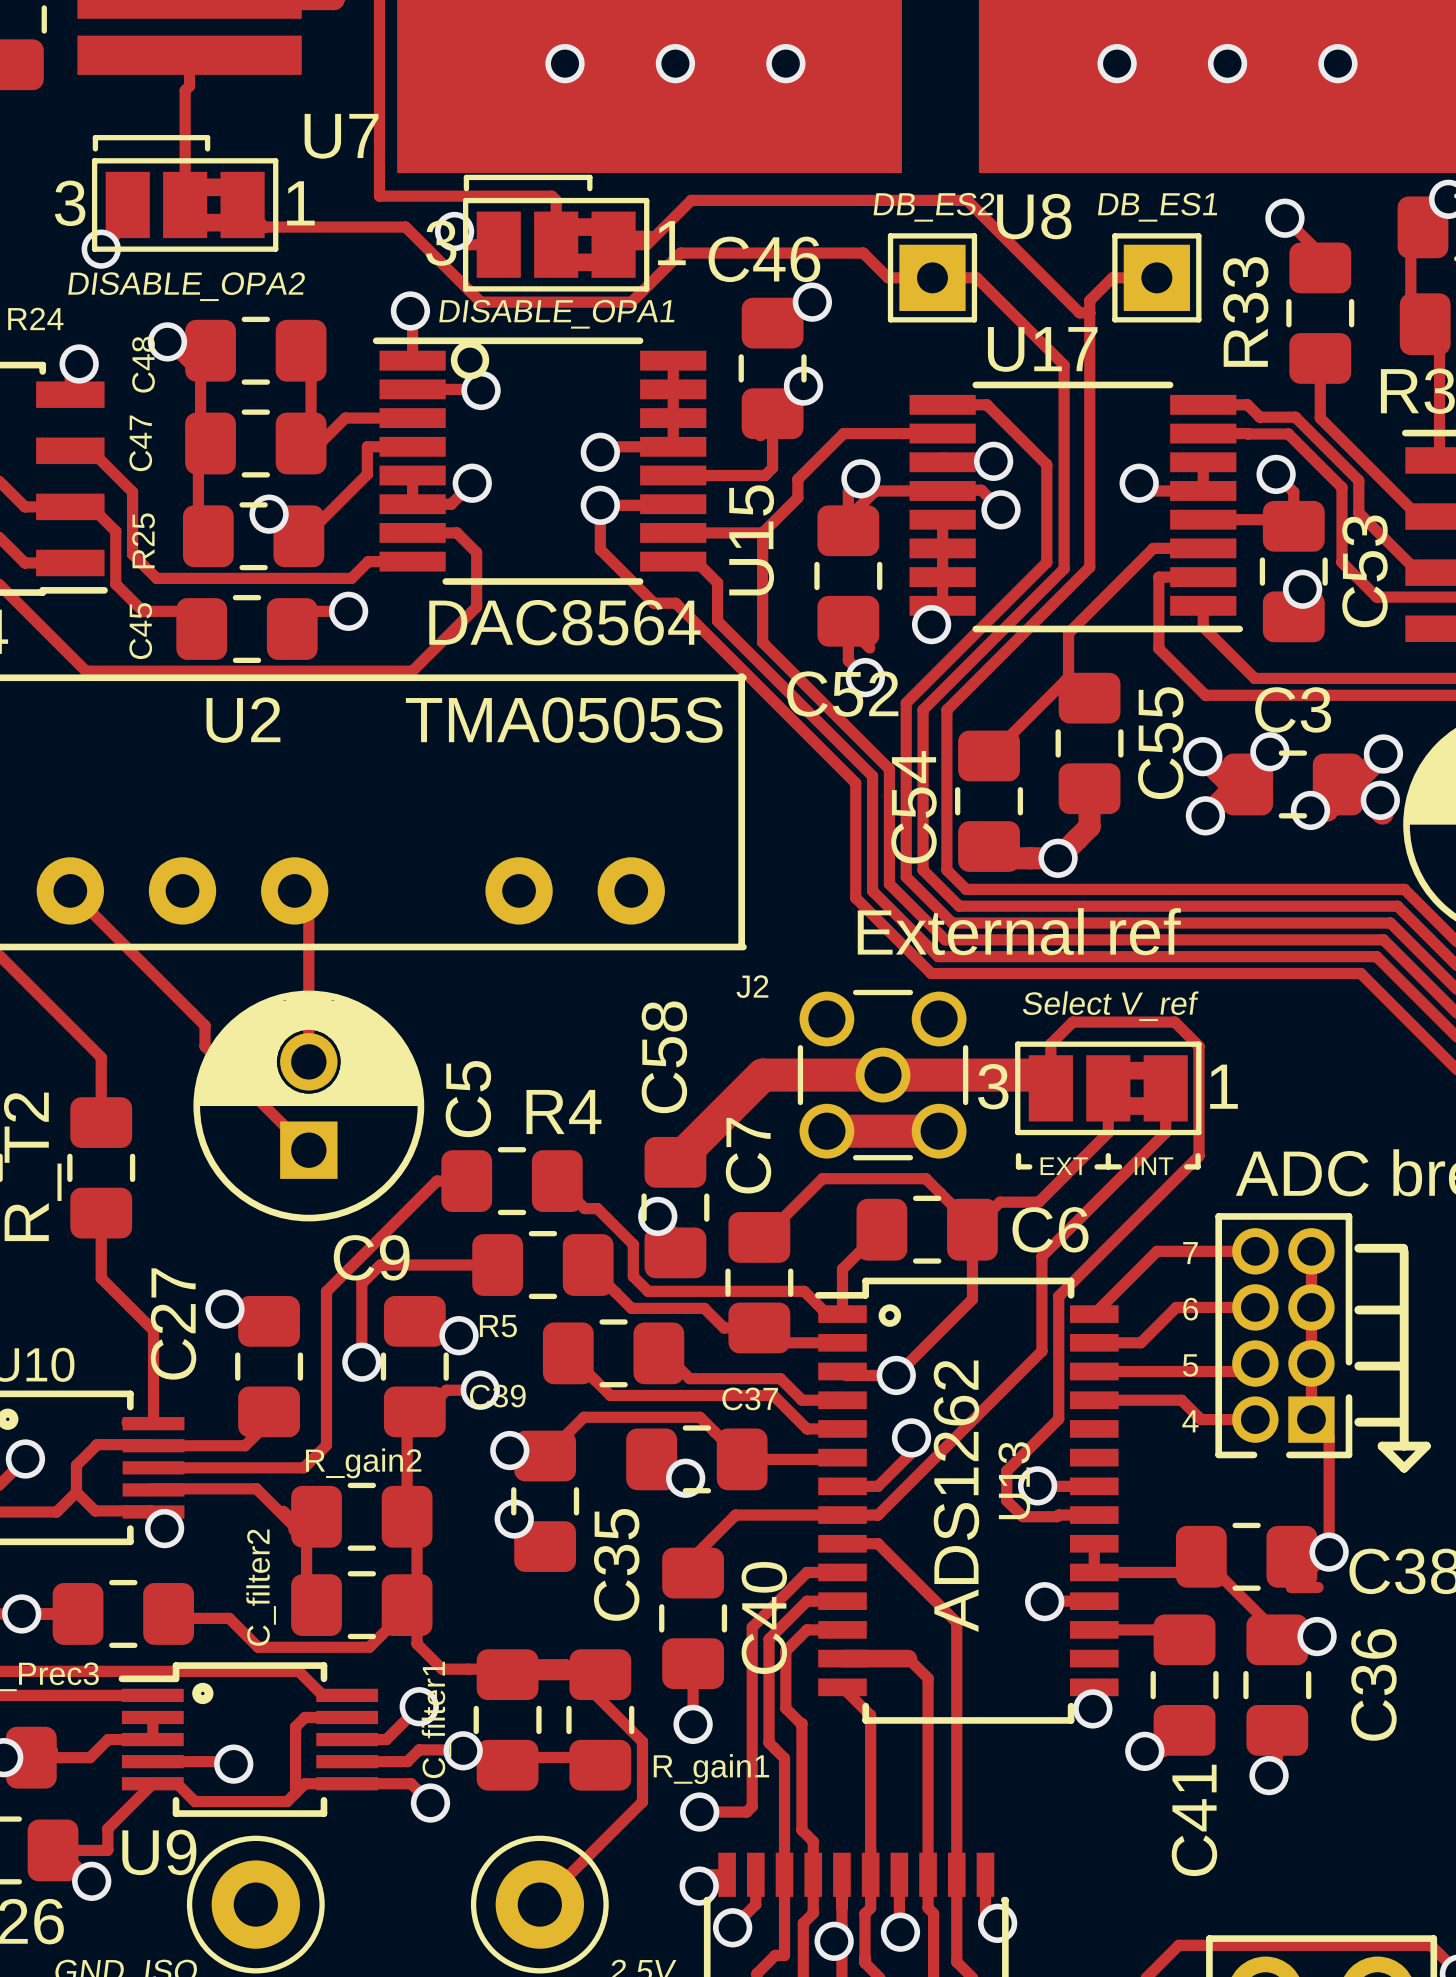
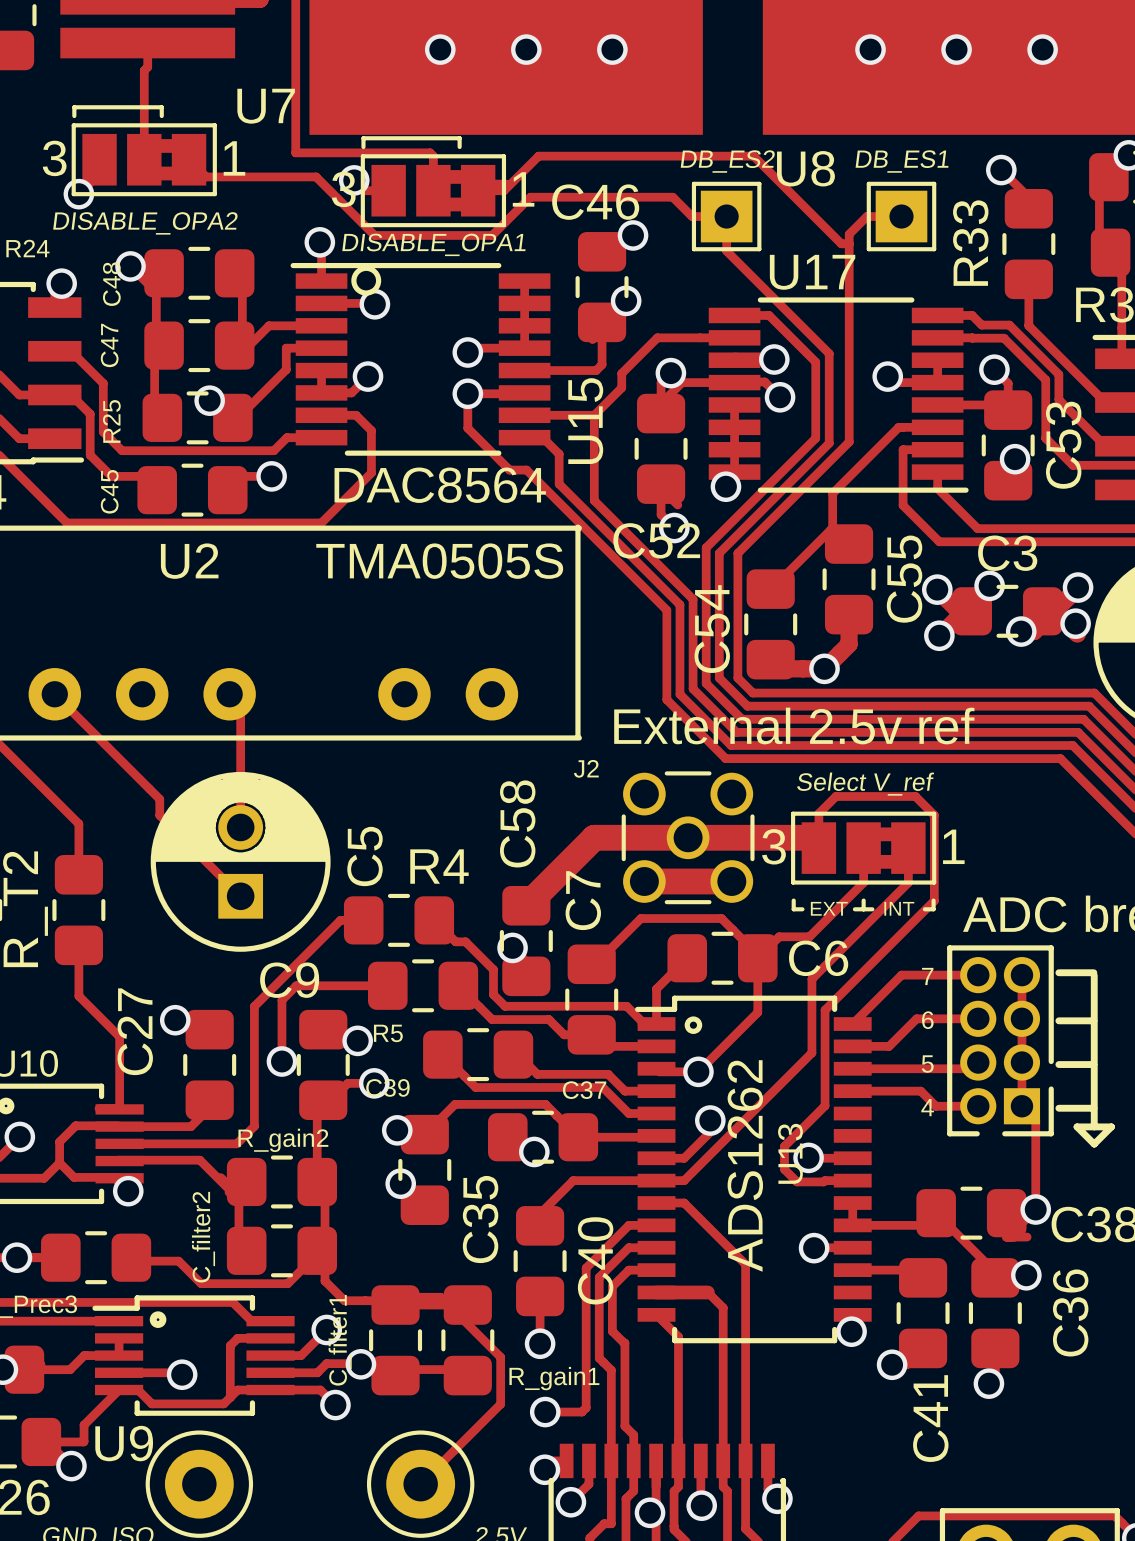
track: (932, 277) (976, 277) (1064, 365) (1064, 453) -> (726, 216) (726, 251) (829, 353)
J2 value: External ref (1019, 931) -> External 2.5v ref (794, 726)

